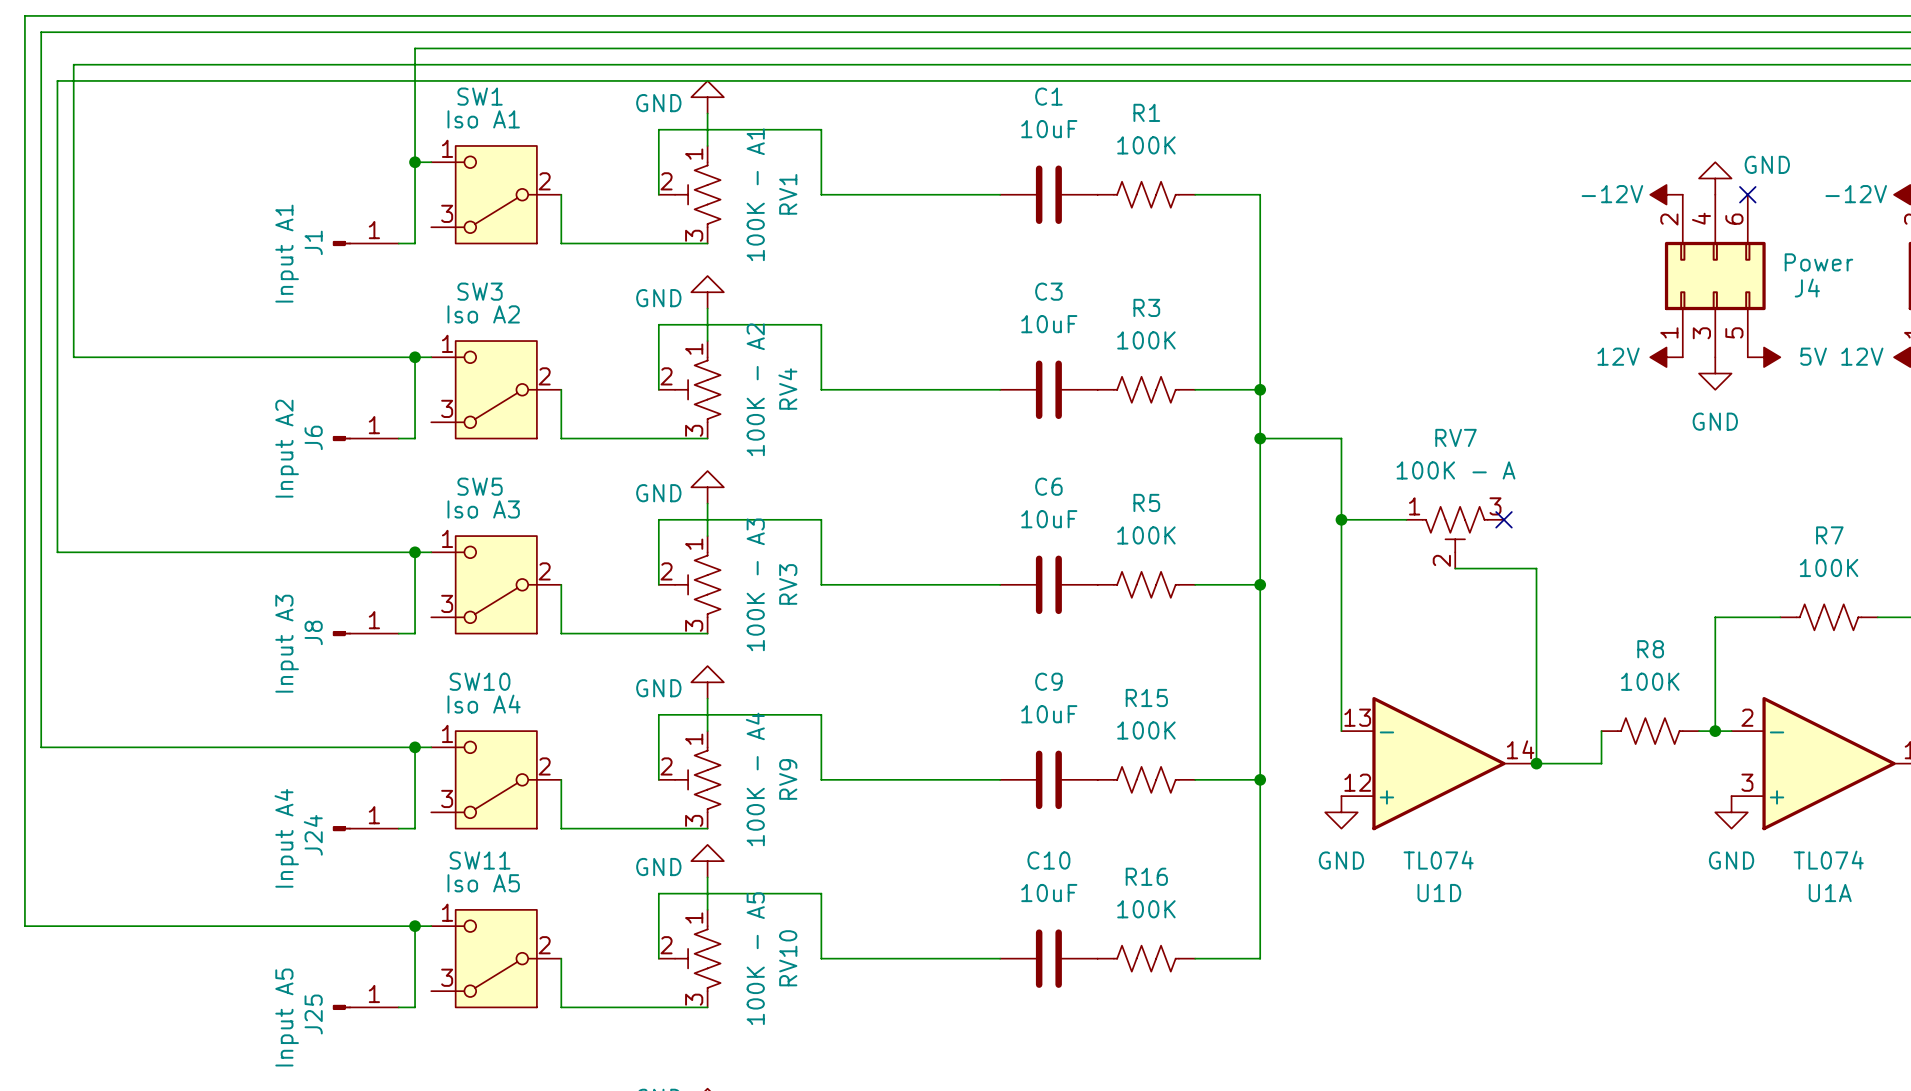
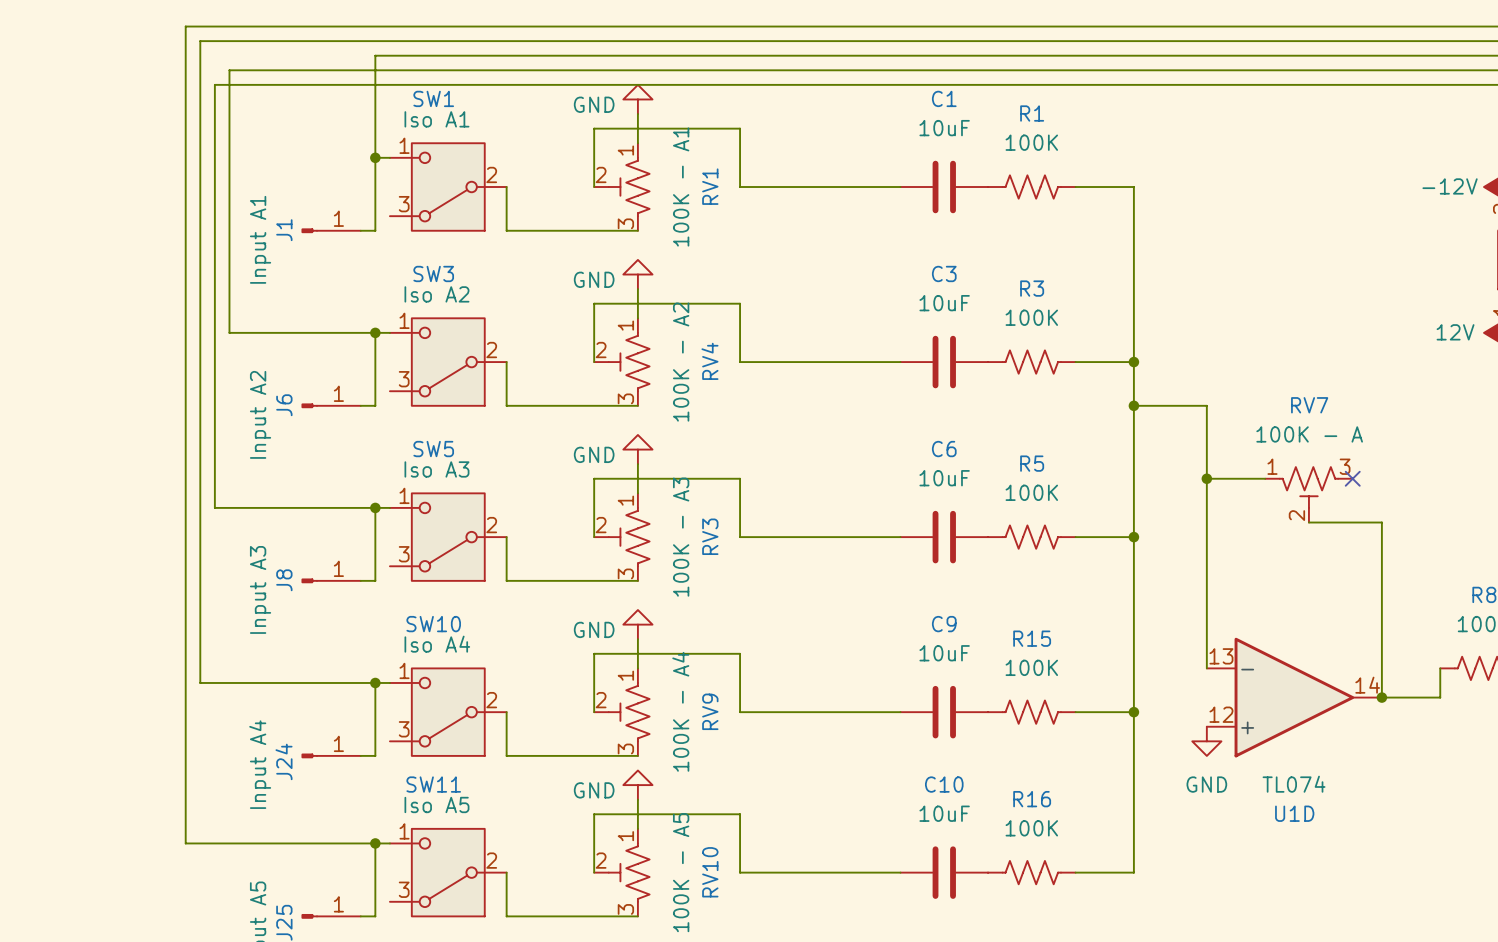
wire: (203, 15) (24, 15) (24, 926) (203, 926) -> (185, 26) (185, 843)
wire: (219, 32) (41, 32) (41, 747) (219, 747) -> (200, 41) (200, 682)
wire: (252, 64) (73, 64) (73, 357) (252, 357) -> (229, 70) (229, 332)
wire: (236, 80) (57, 80) (57, 552) (236, 552) -> (214, 84) (214, 507)

